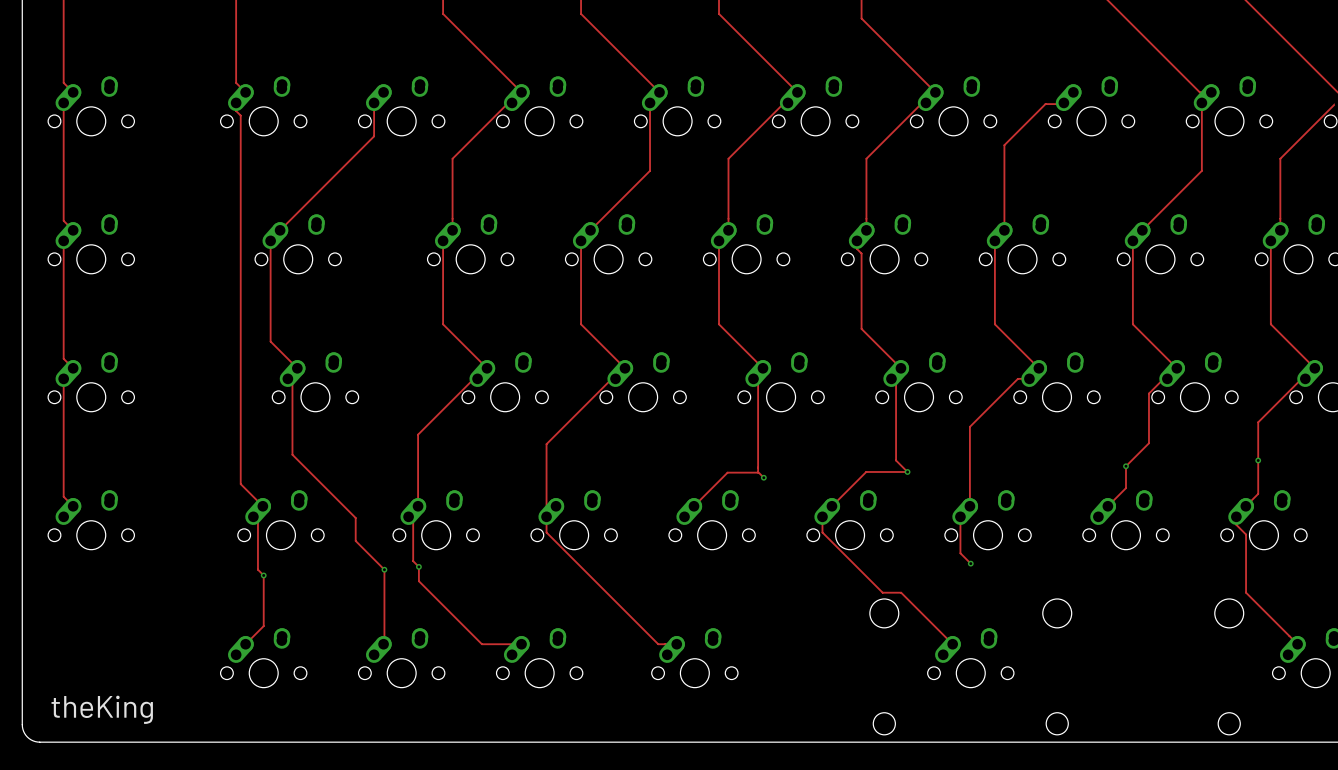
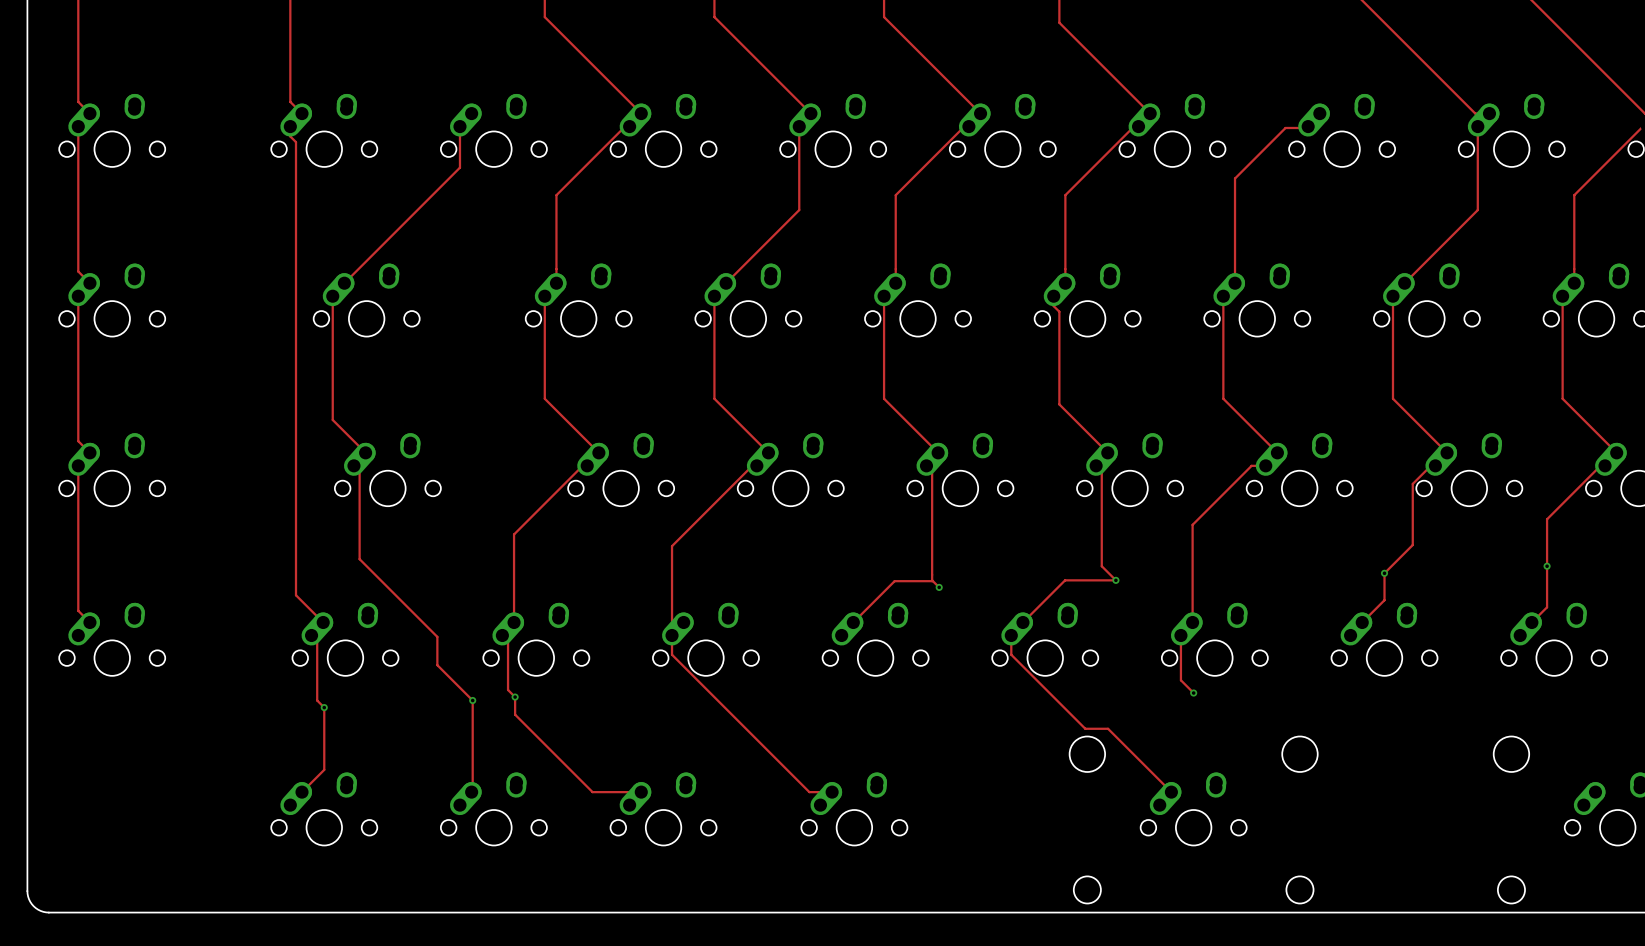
track: (1236, 516) (1236, 524) (1246, 534) (1246, 592) (1297, 644) -> none
text: theKing (102, 709) -> none

